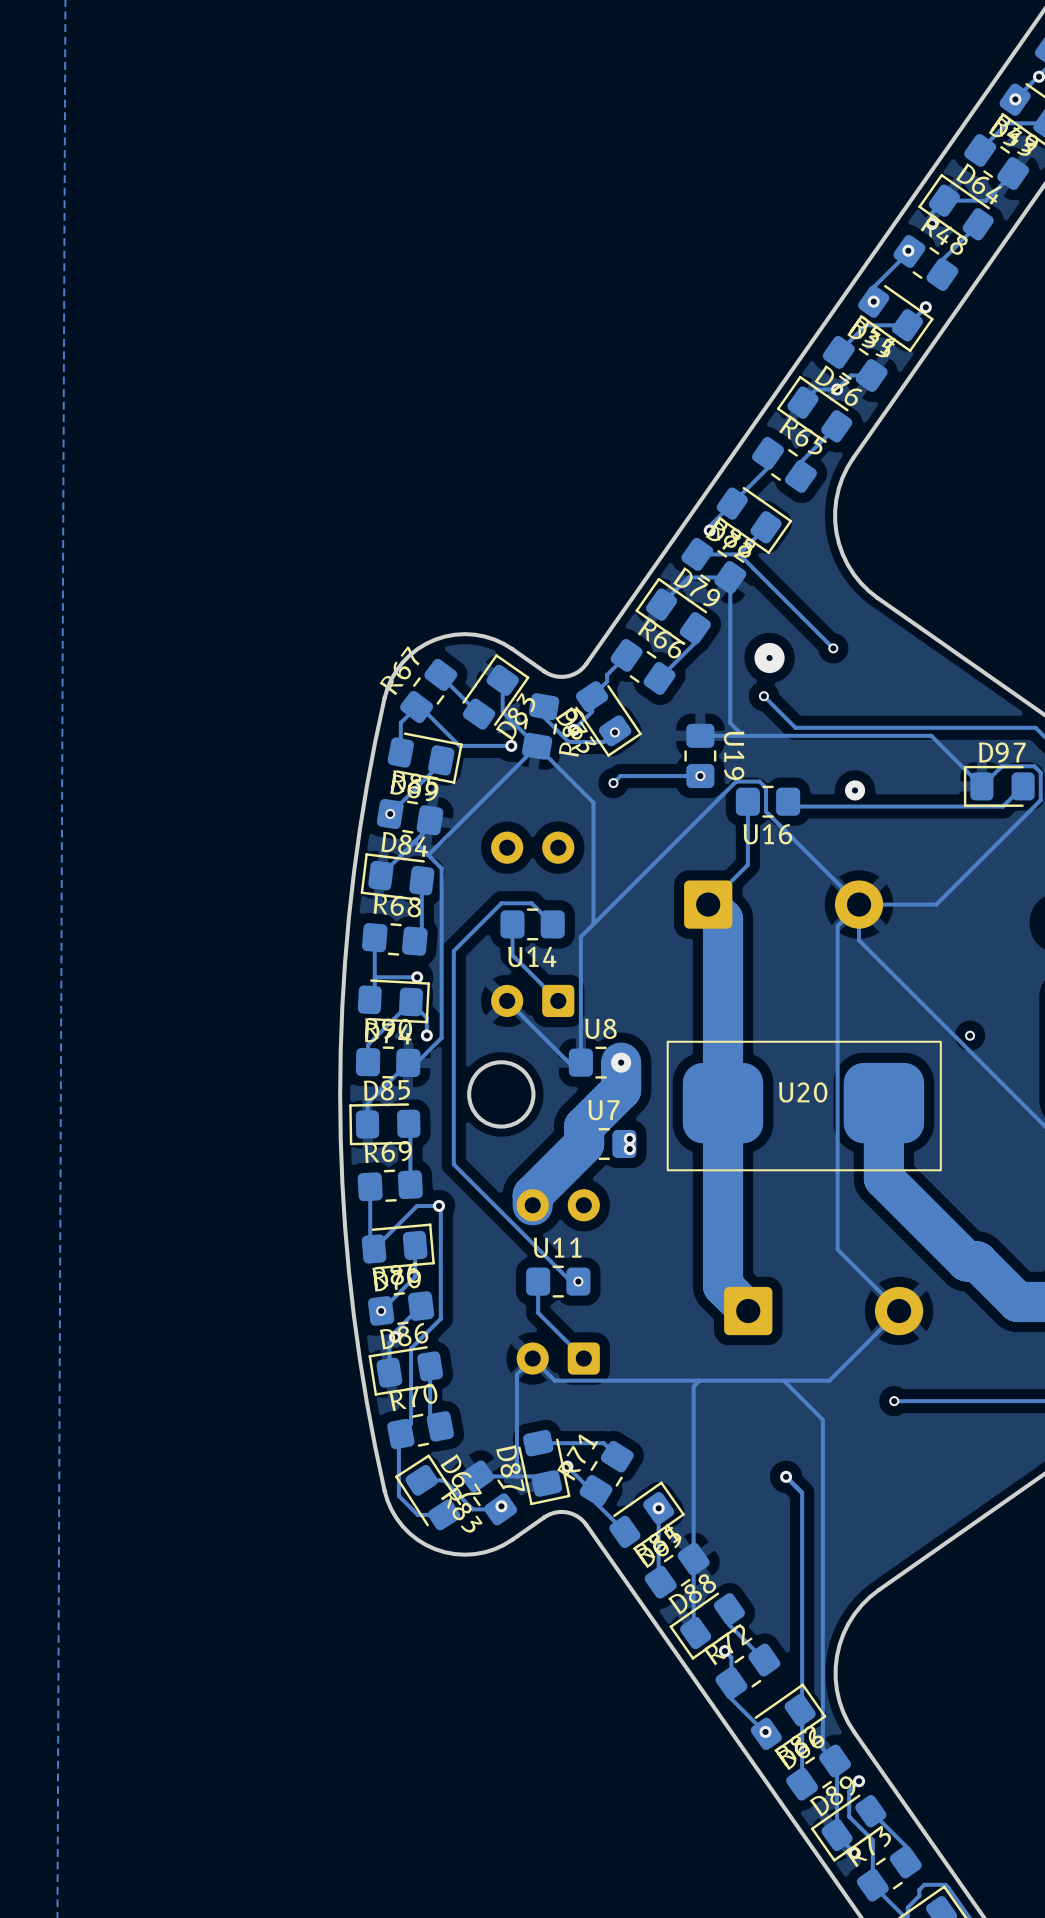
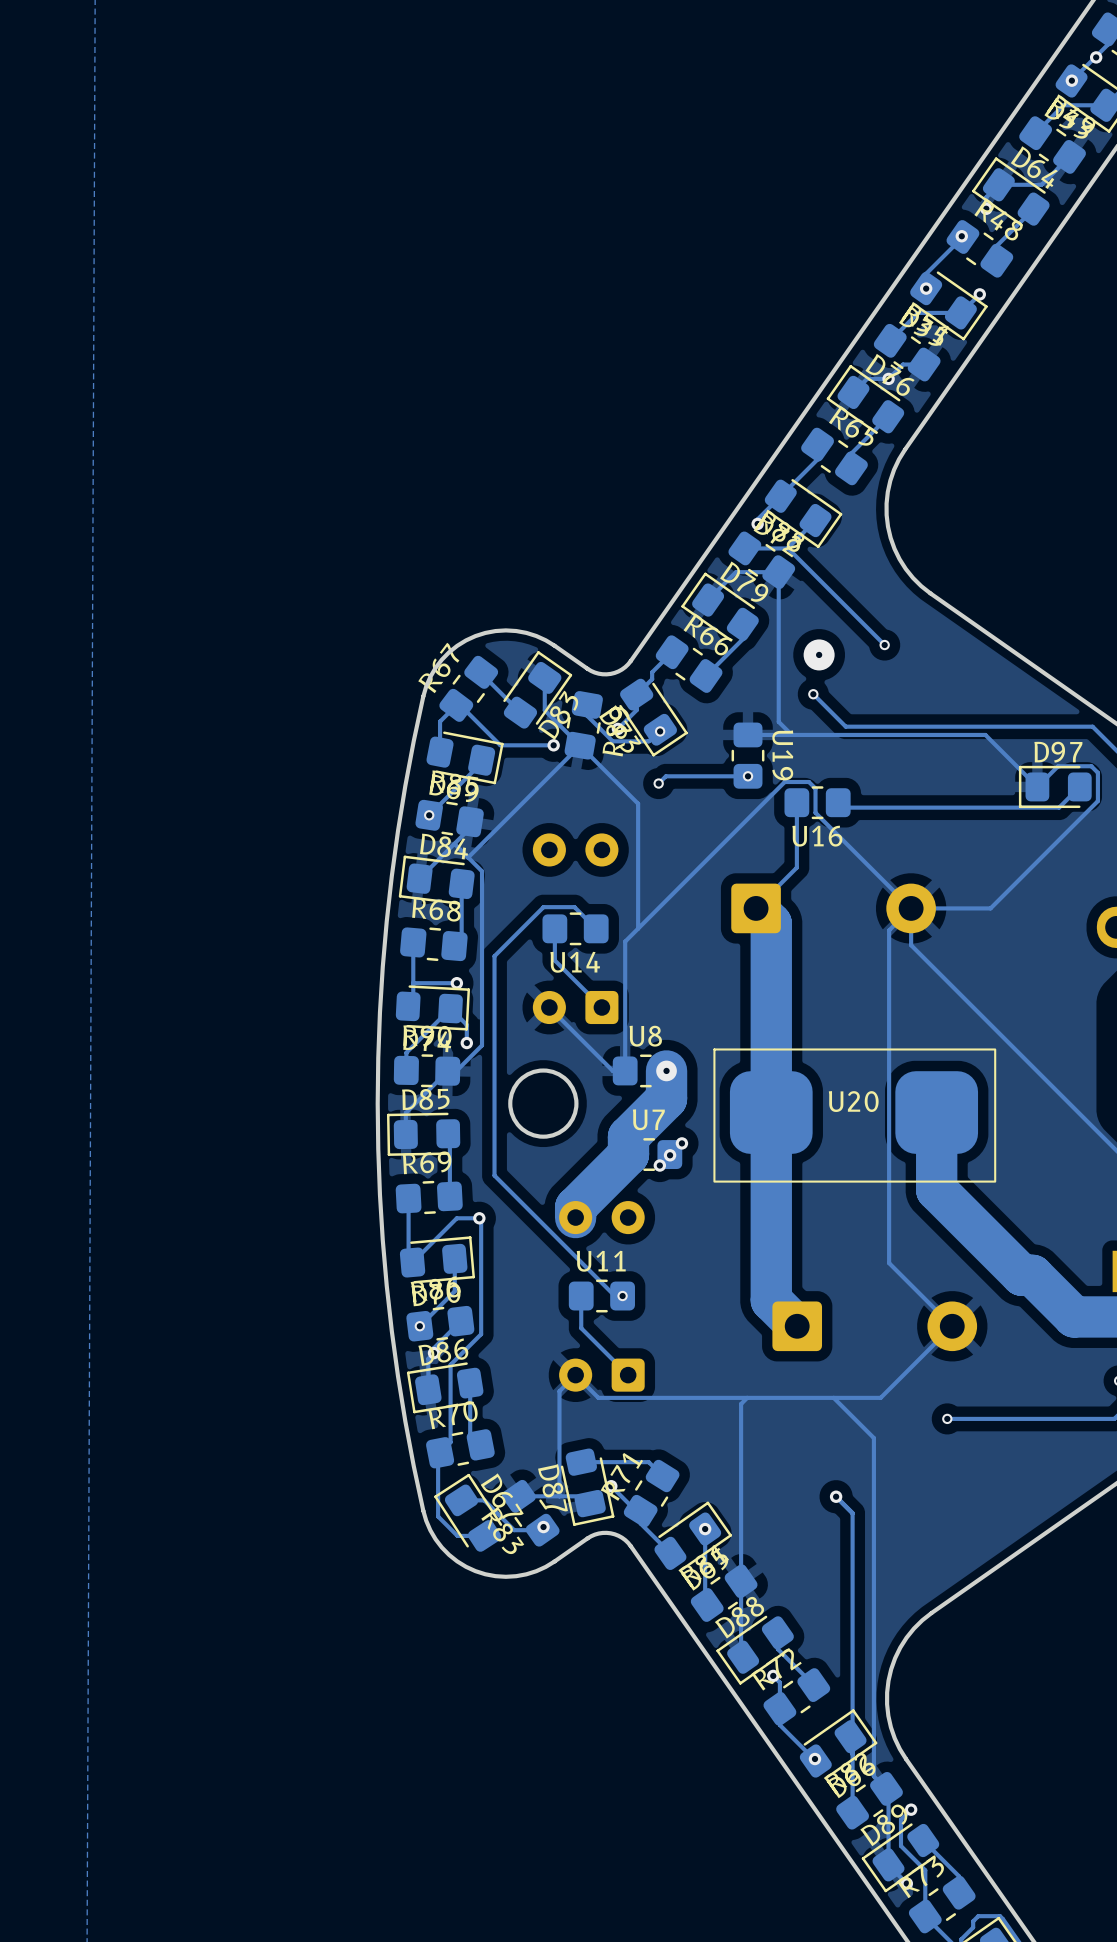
via: (855, 790) -> none
via: (970, 1035) -> none
via: none -> (681, 1143)
via: (629, 1138) -> none
via: none -> (670, 1155)
via: (629, 1149) -> none
via: none -> (659, 1165)

